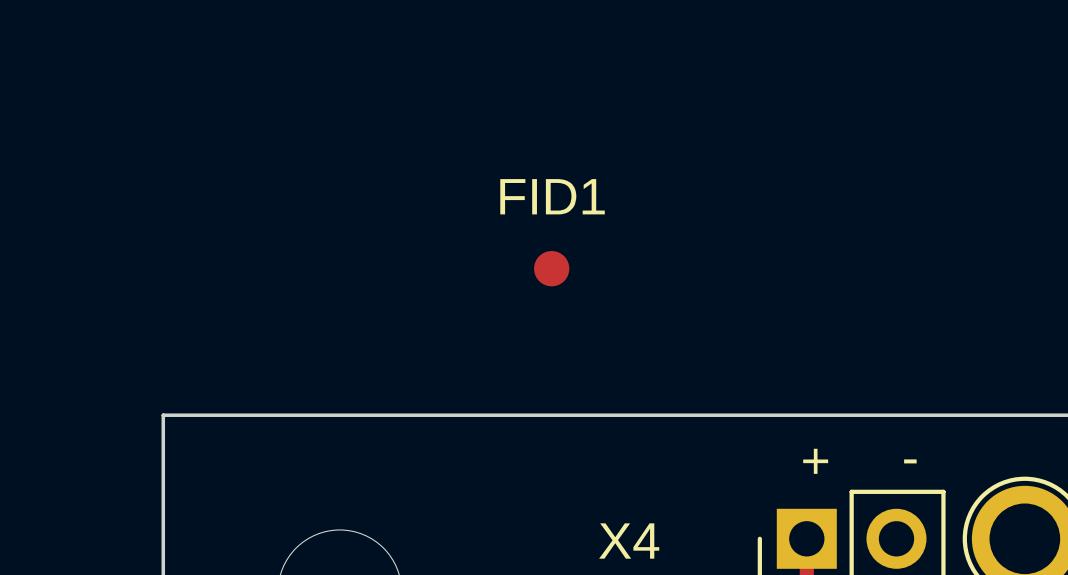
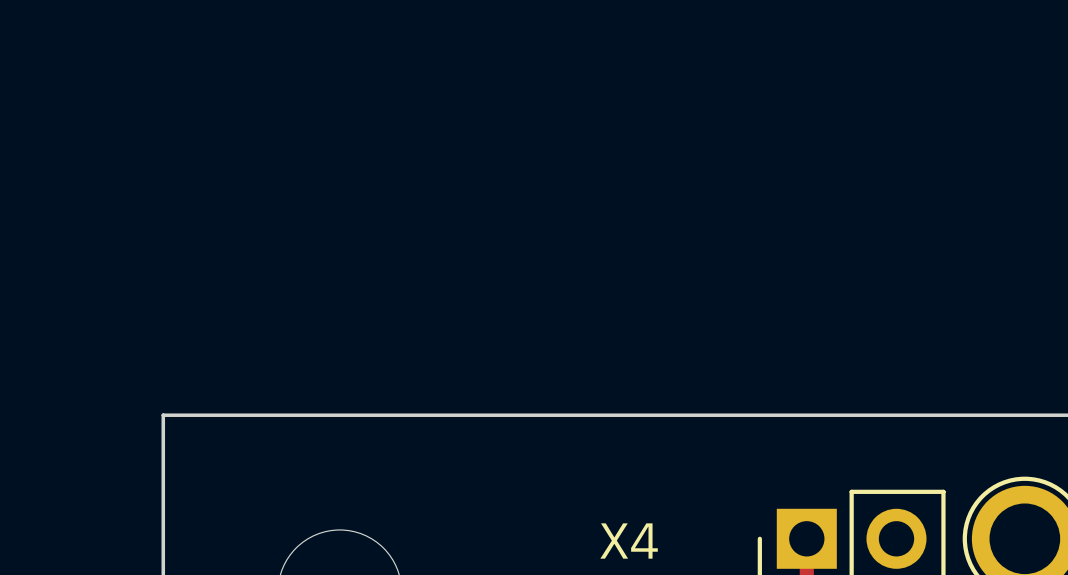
FID1: (551, 268) -> none
text: + (815, 461) -> none
text: - (910, 461) -> none

